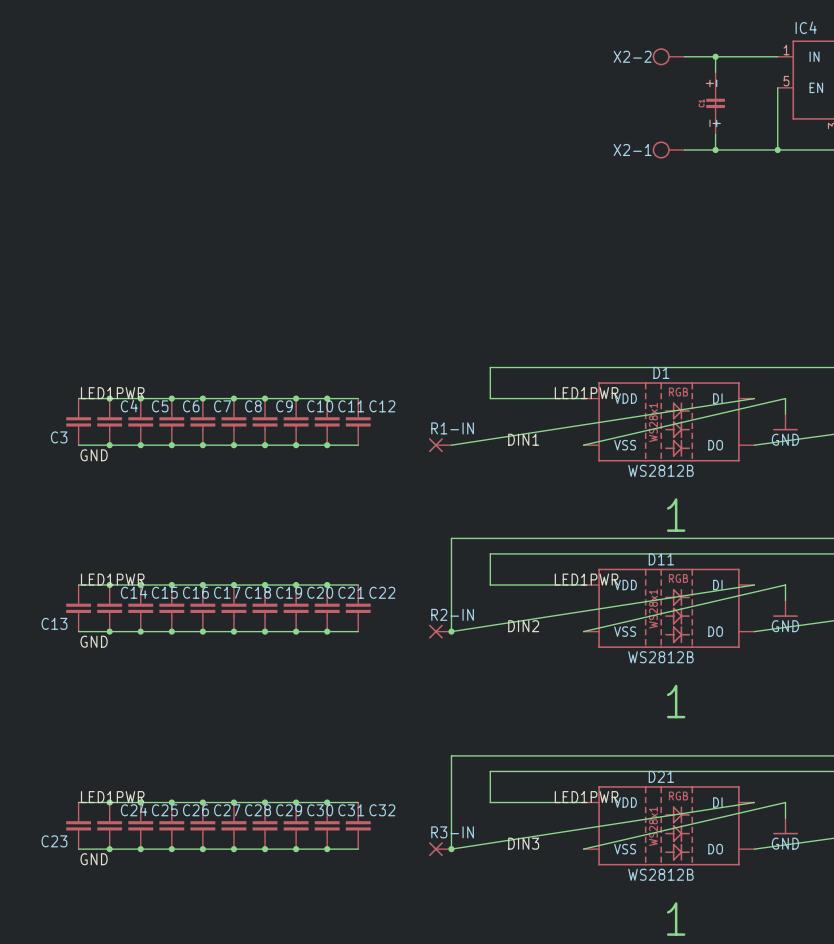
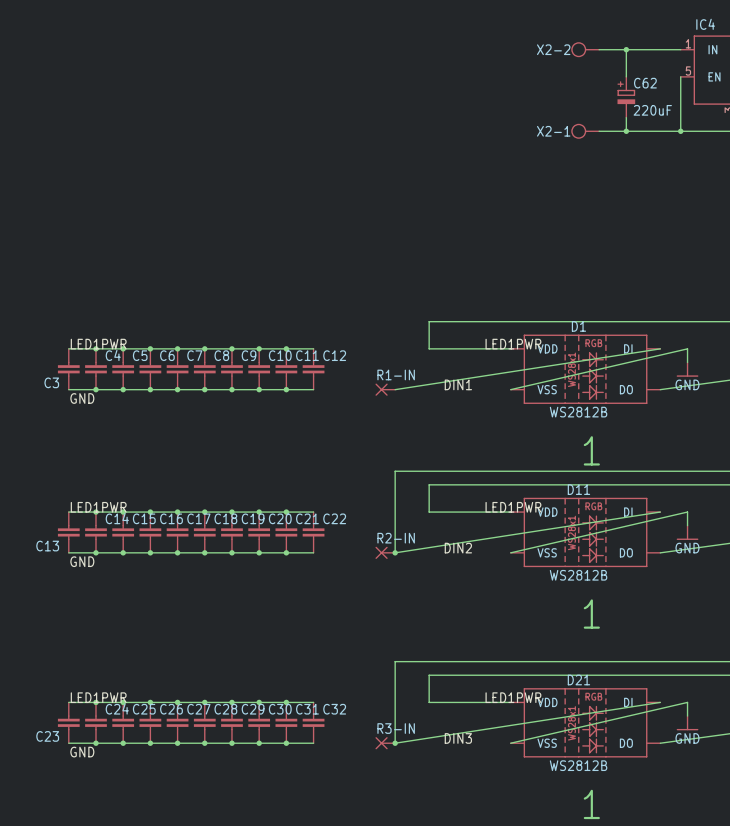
part: (715, 103) -> none
C62: none -> 220uF (626, 97)

